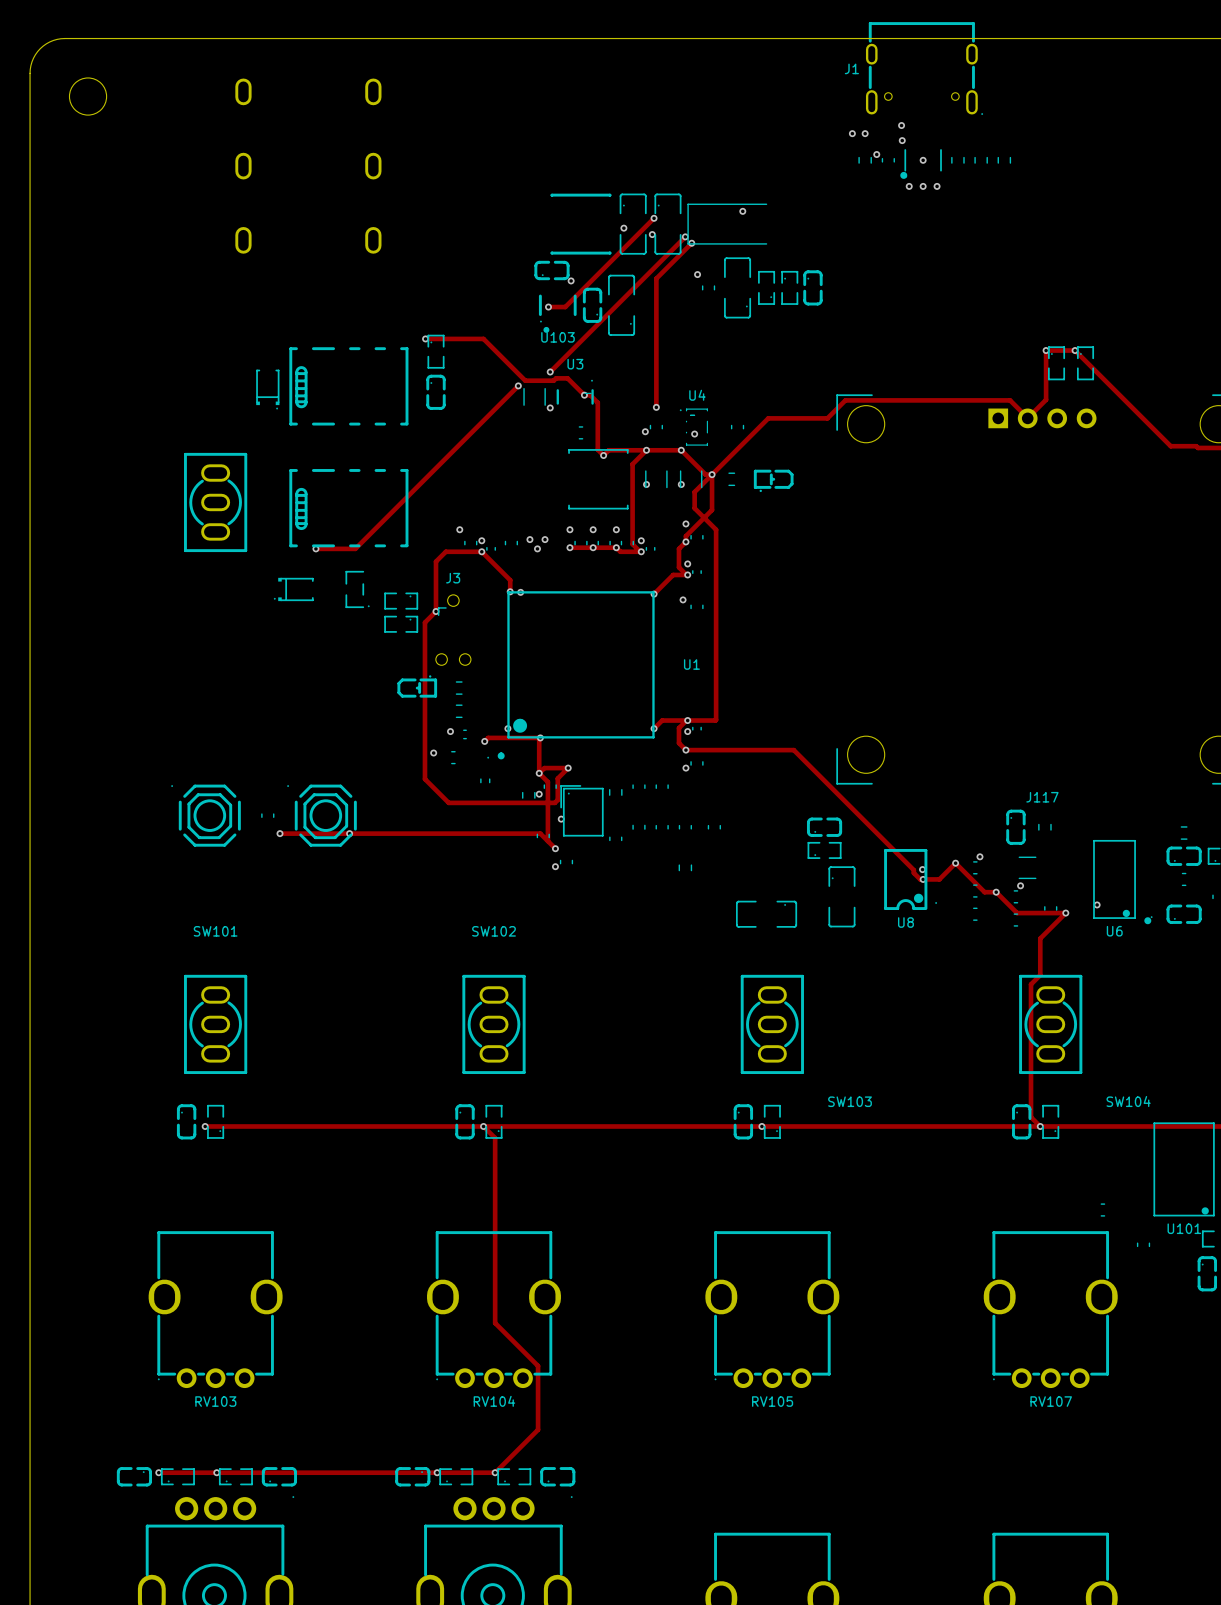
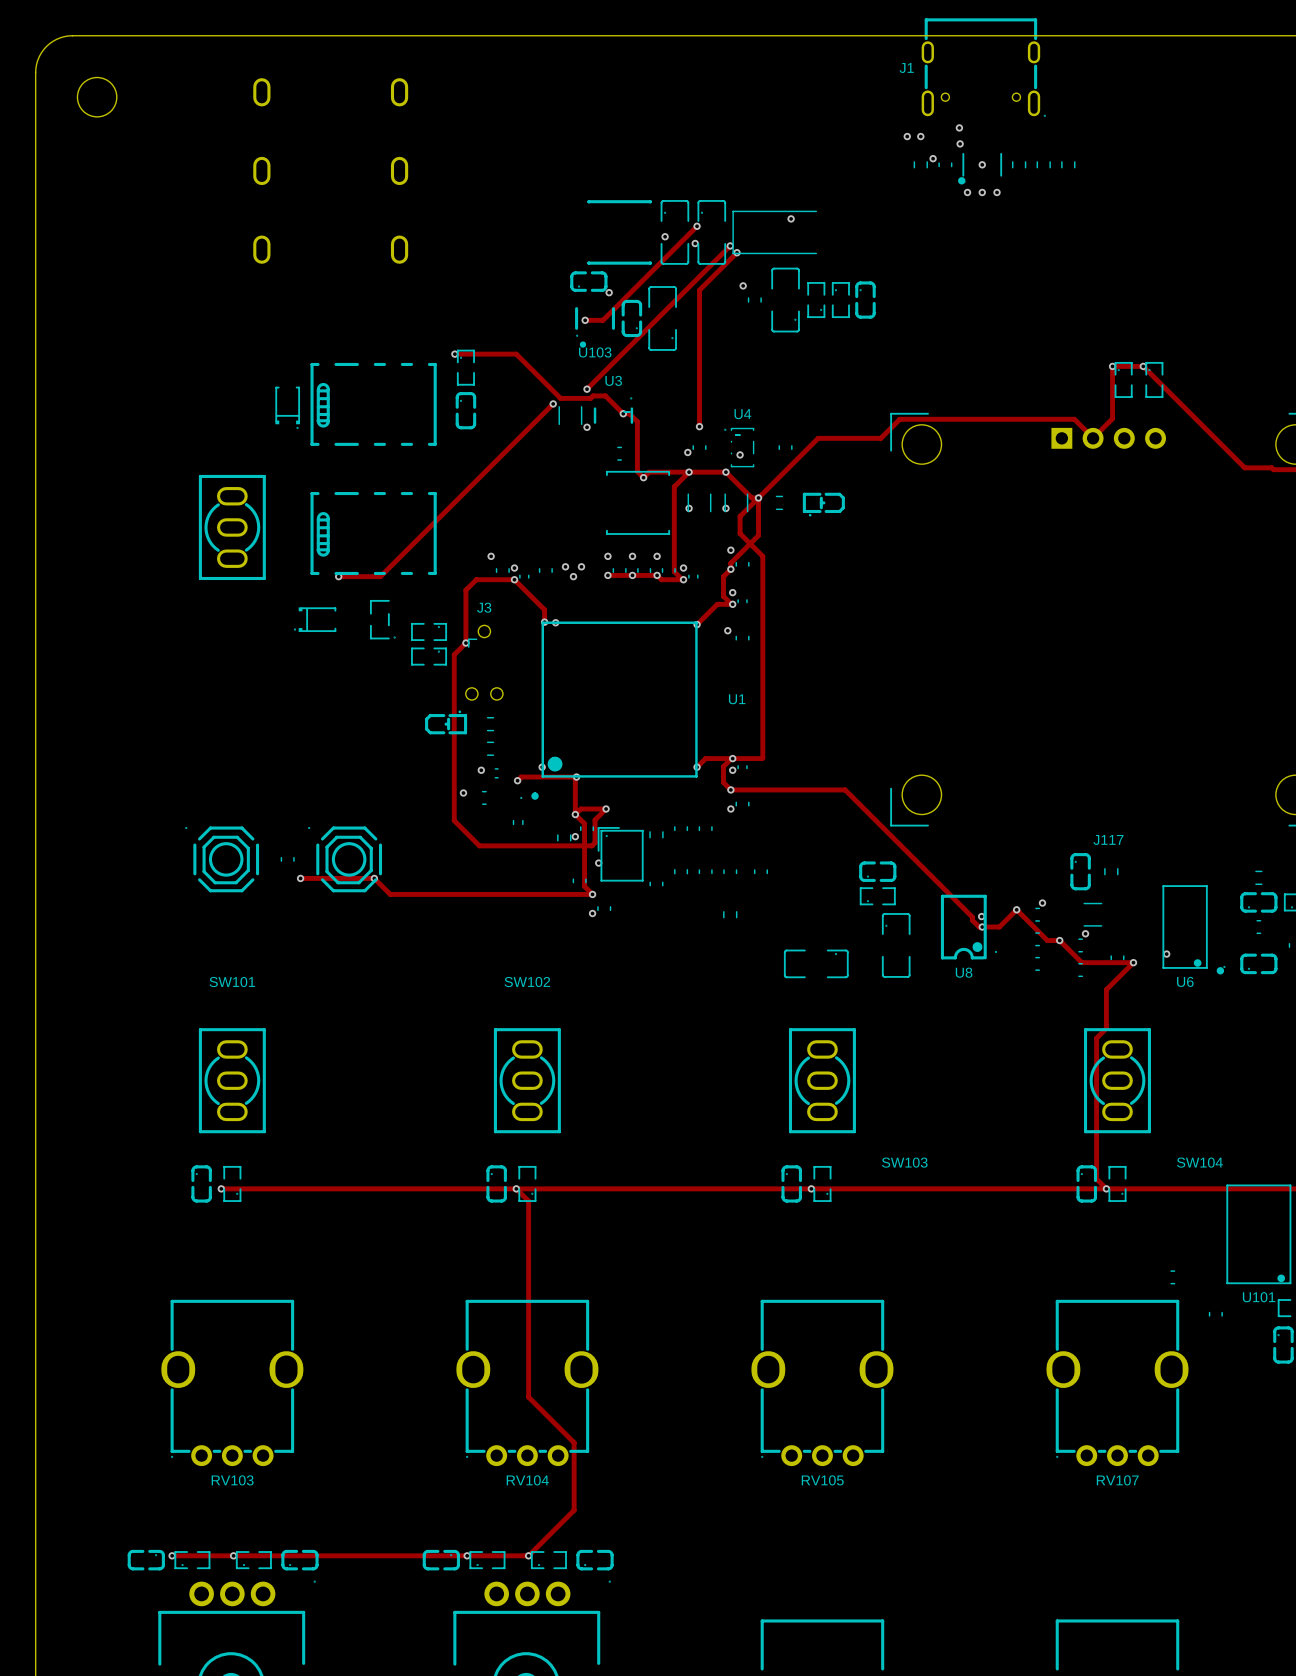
track: (349, 833) (540, 833) (547, 841) -> (374, 878) (390, 894) (592, 894)

